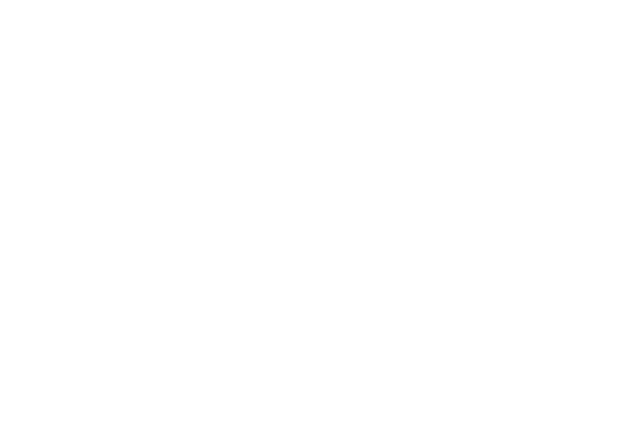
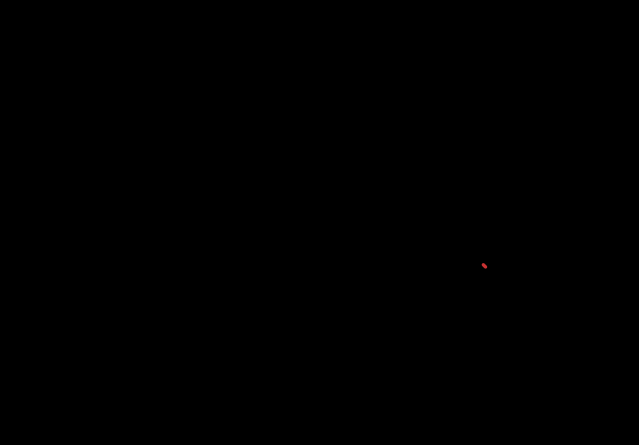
track: none -> (483, 264) (485, 266)

